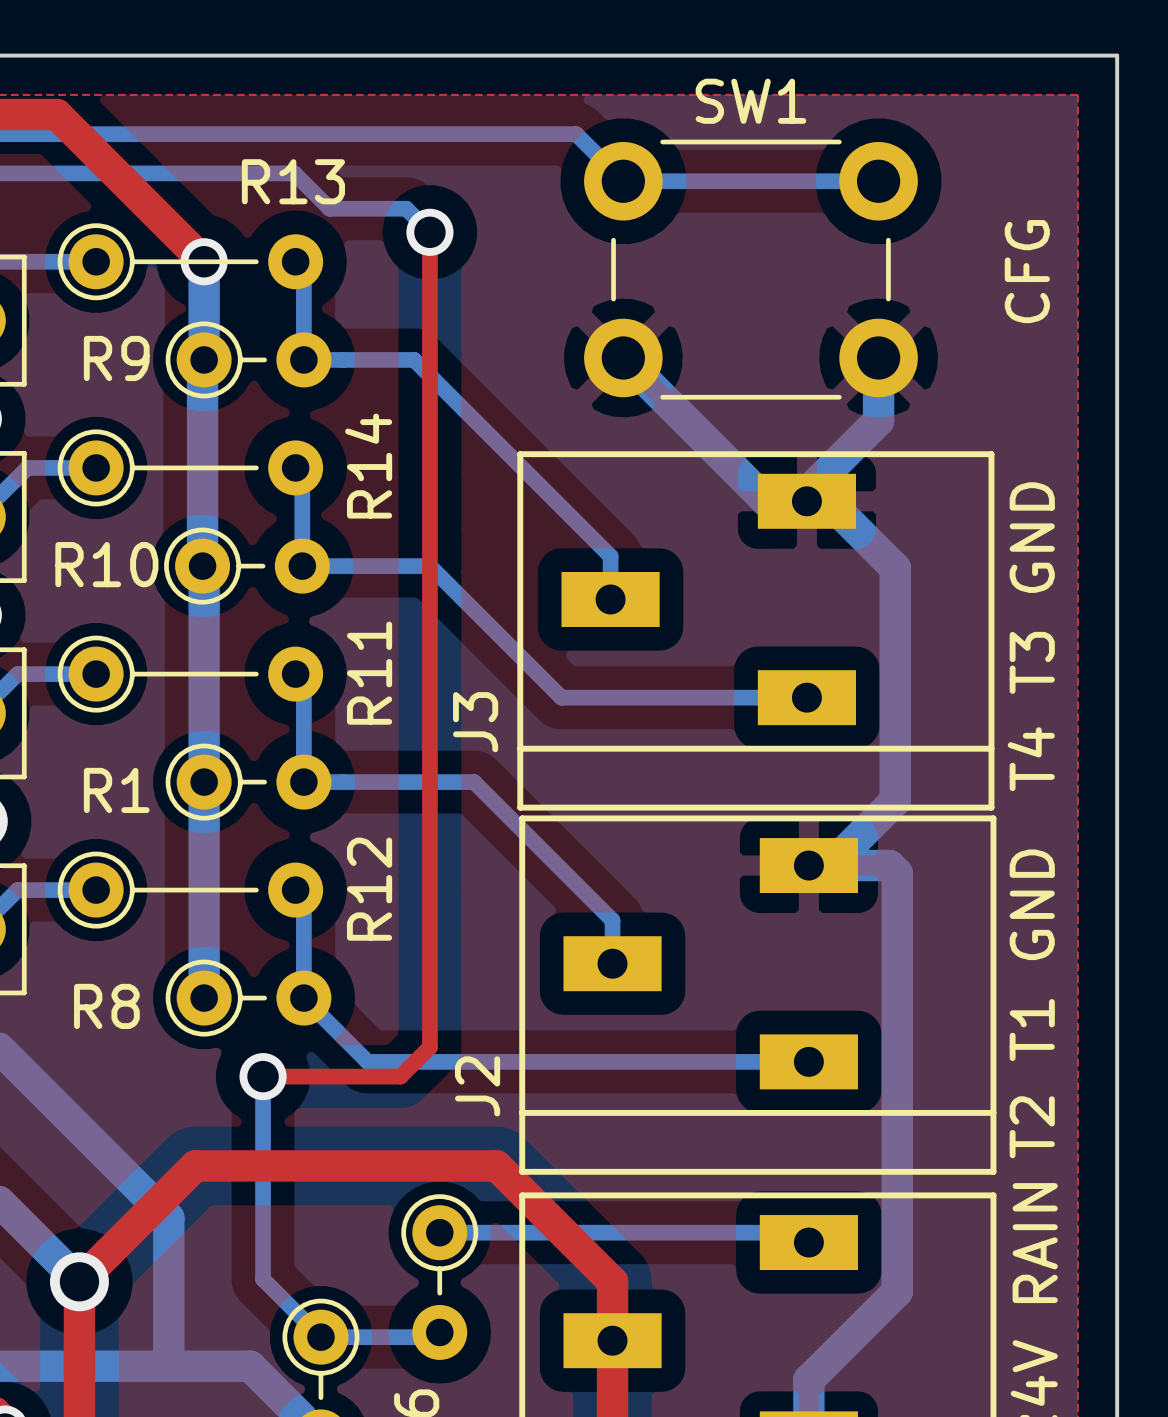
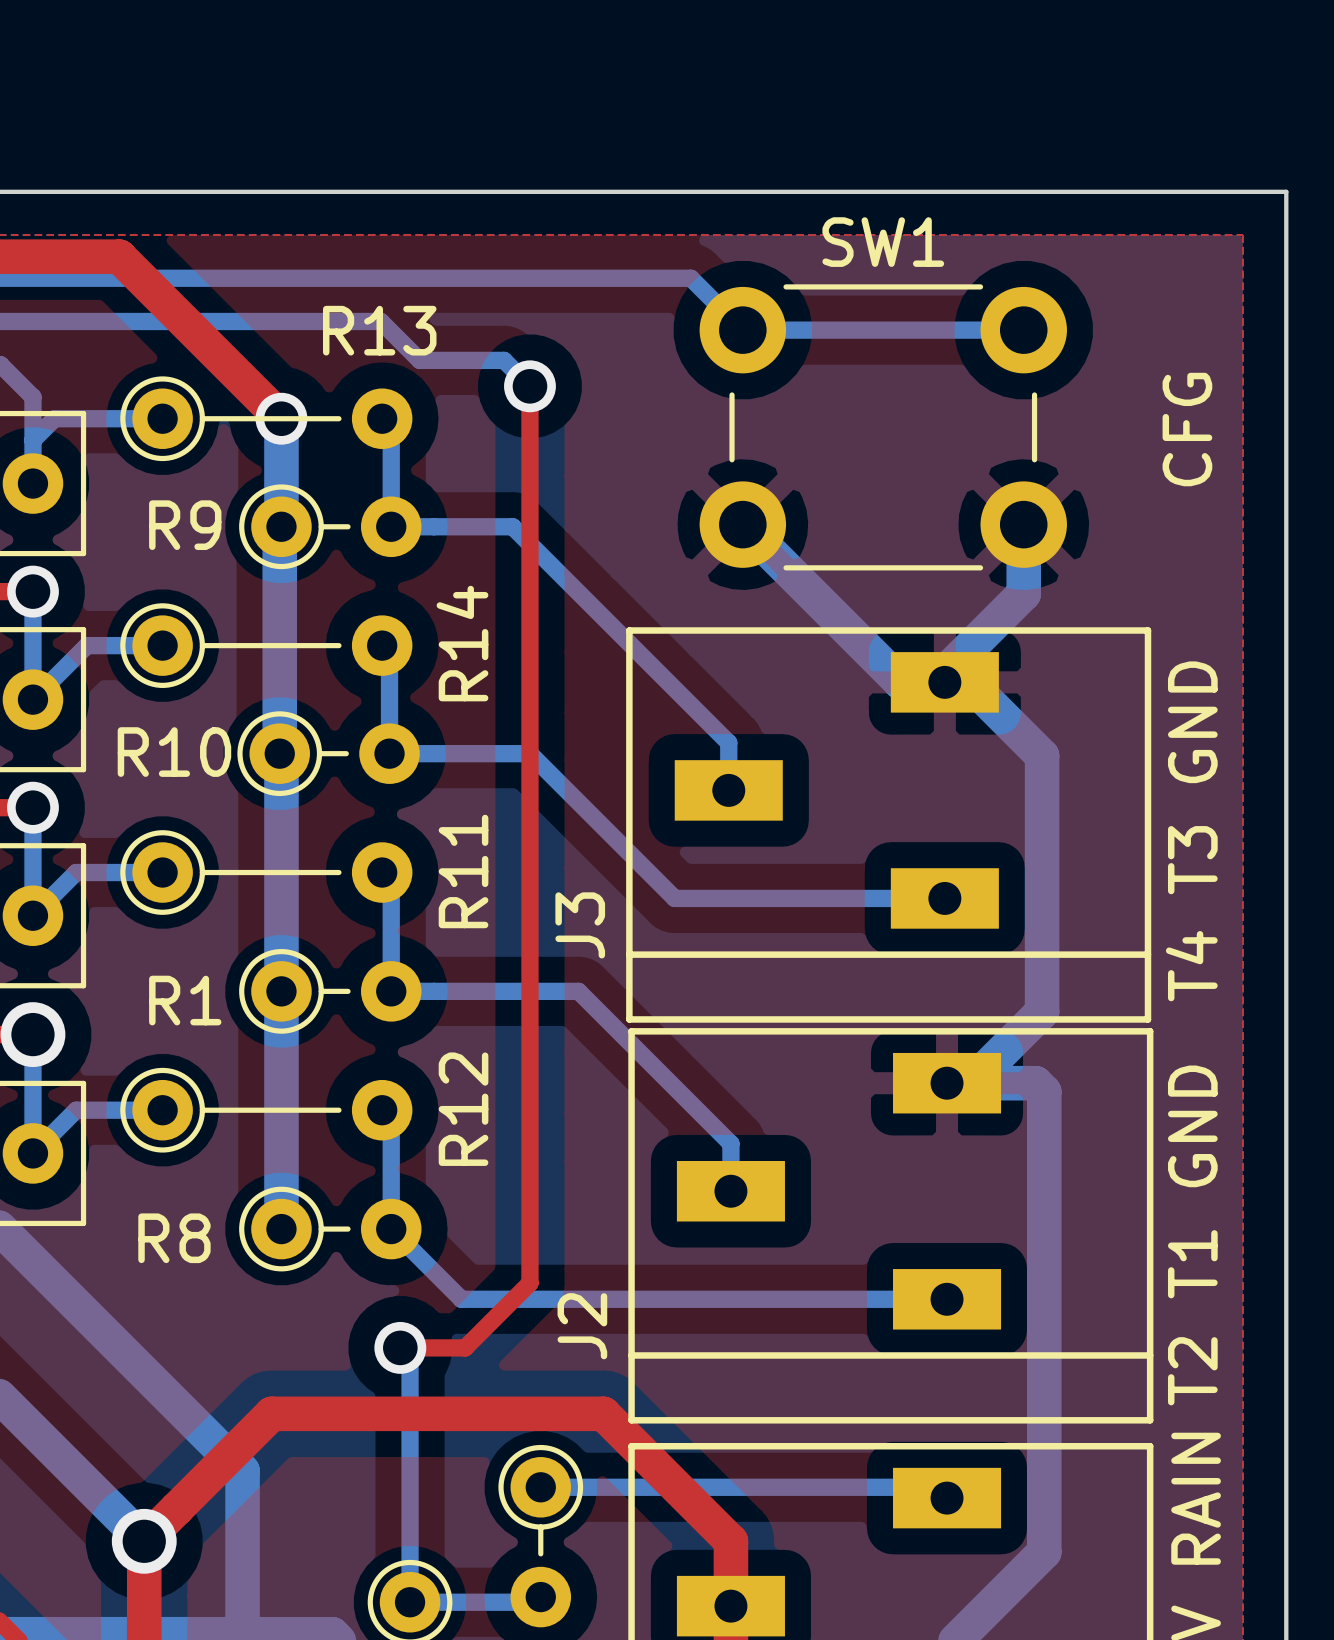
bottom track: (263, 1076) (263, 1279) (320, 1337) -> (400, 1347) (410, 1357) (410, 1602)
top track: (263, 1076) (400, 1076) -> (400, 1347) (465, 1347) (497, 1315)
via position: (263, 1076) -> (400, 1347)

